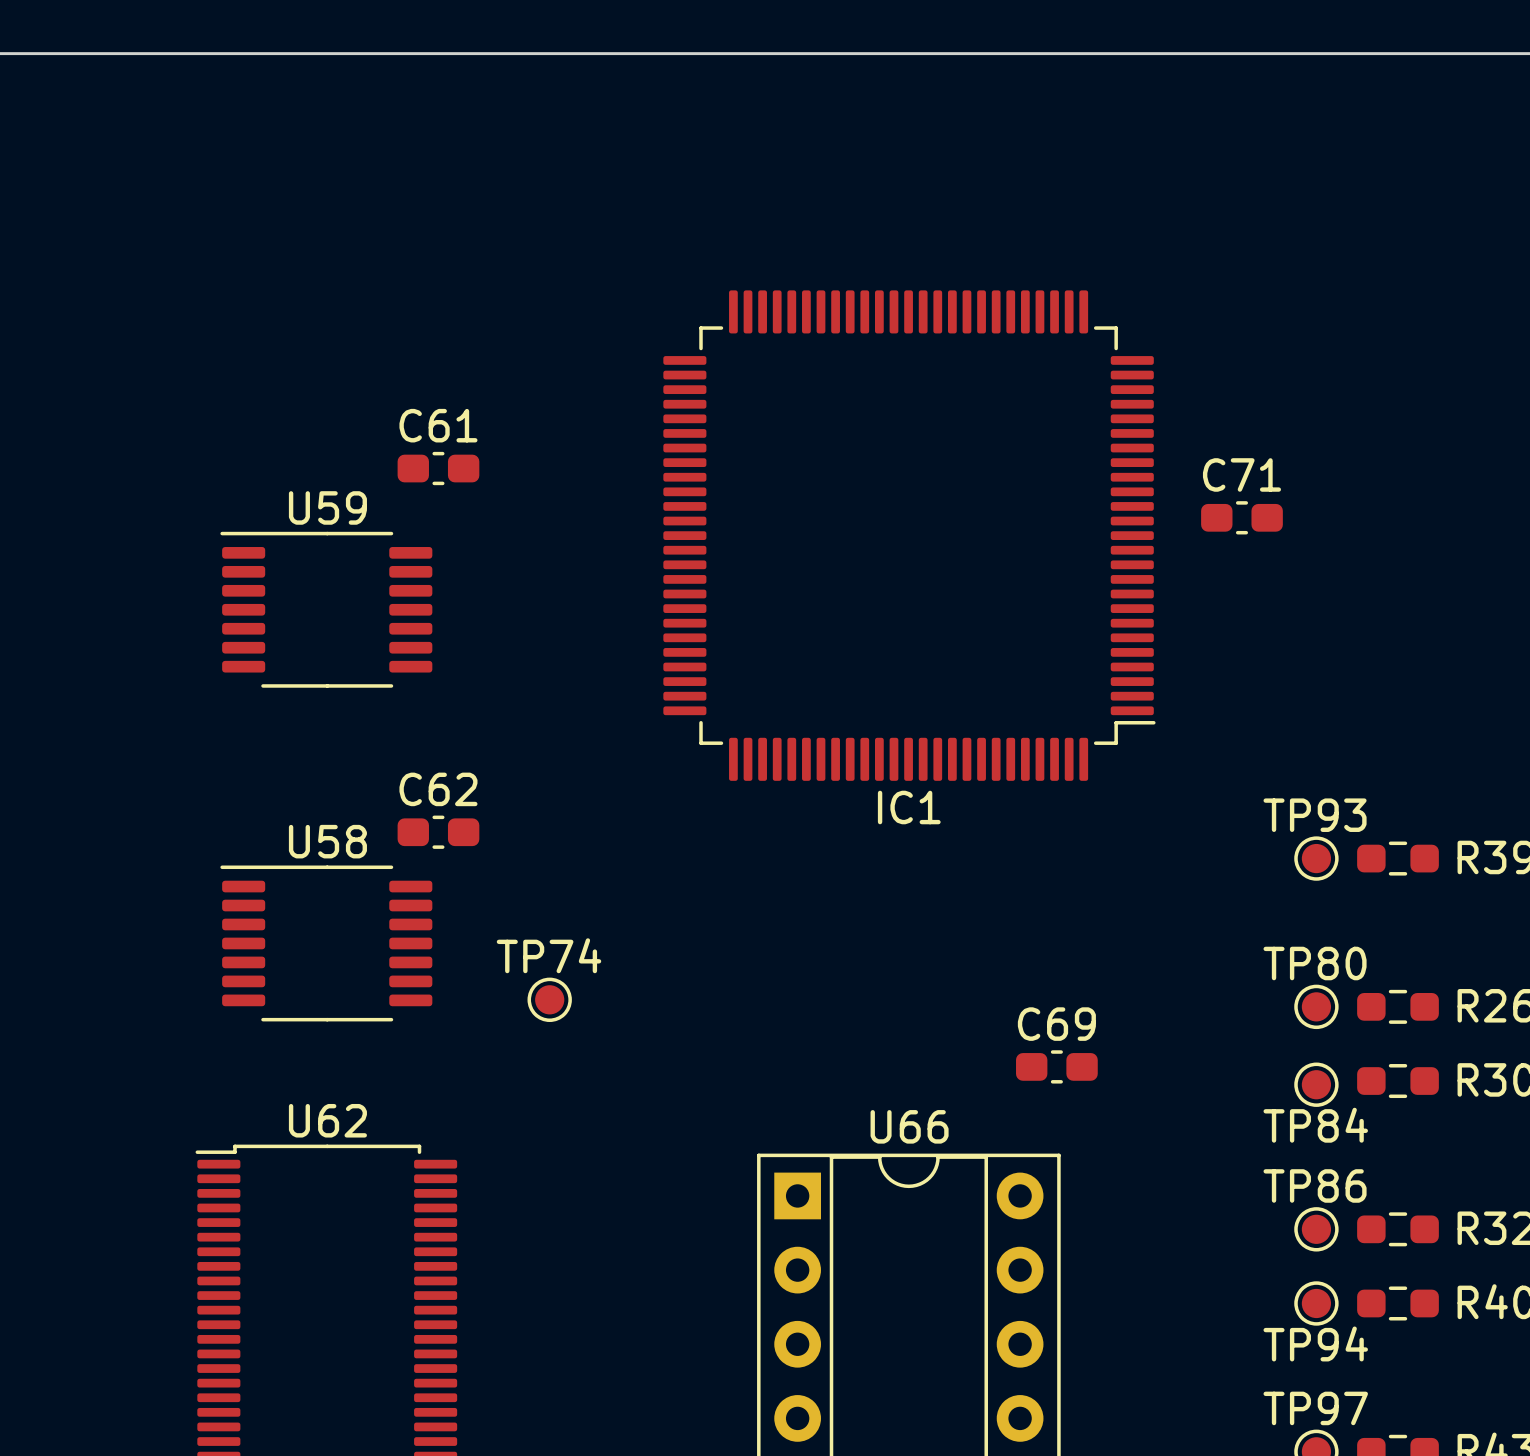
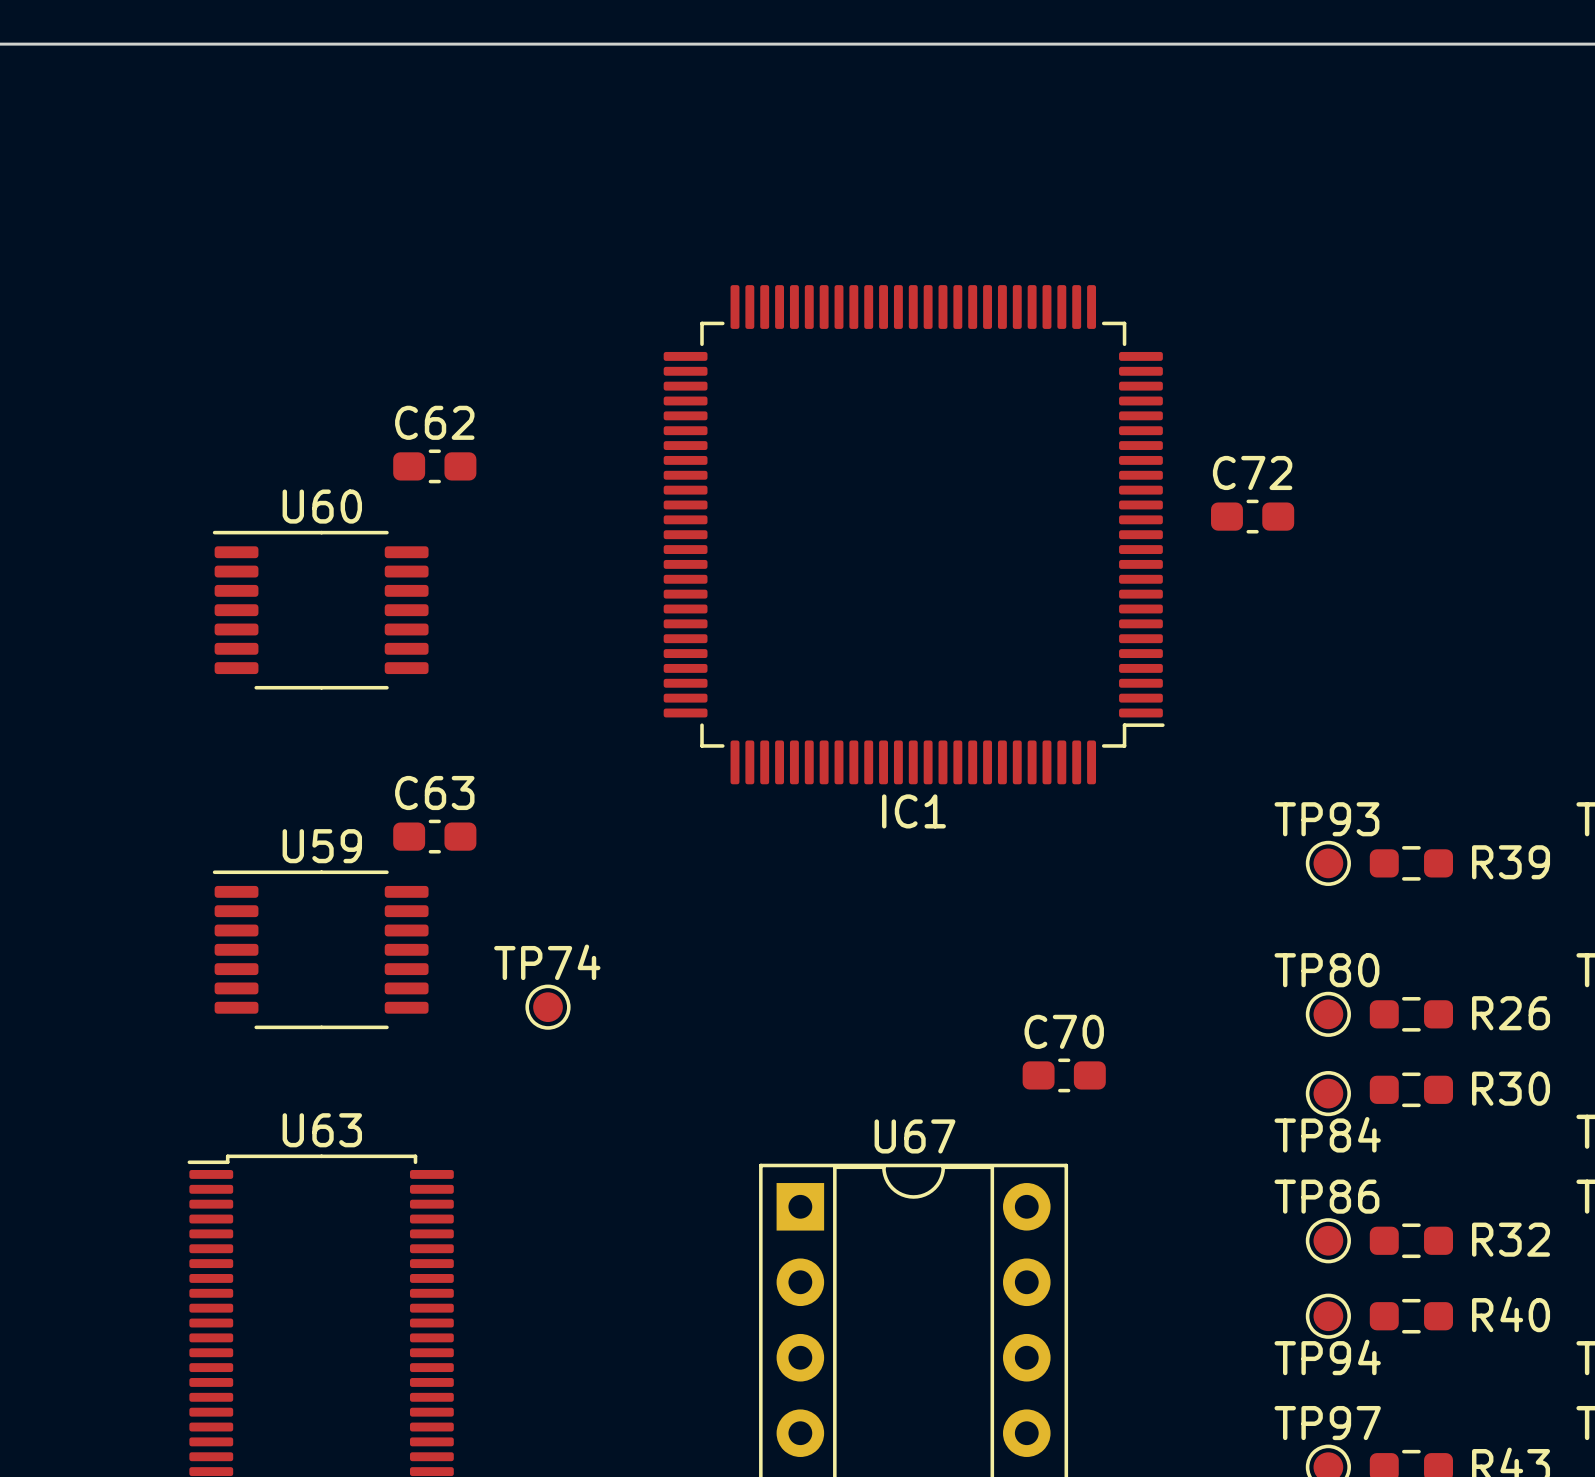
C61 name: C61 (438, 425) -> C62 (434, 422)
C71 name: C71 (1241, 474) -> C72 (1252, 472)
U59 name: U59 (327, 507) -> U60 (322, 506)
C62 name: C62 (438, 789) -> C63 (434, 793)
U58 name: U58 (327, 841) -> U59 (322, 846)
C69 name: C69 (1056, 1024) -> C70 (1064, 1031)
U62 name: U62 (327, 1120) -> U63 (322, 1130)
U66 name: U66 (909, 1126) -> U67 (914, 1136)

